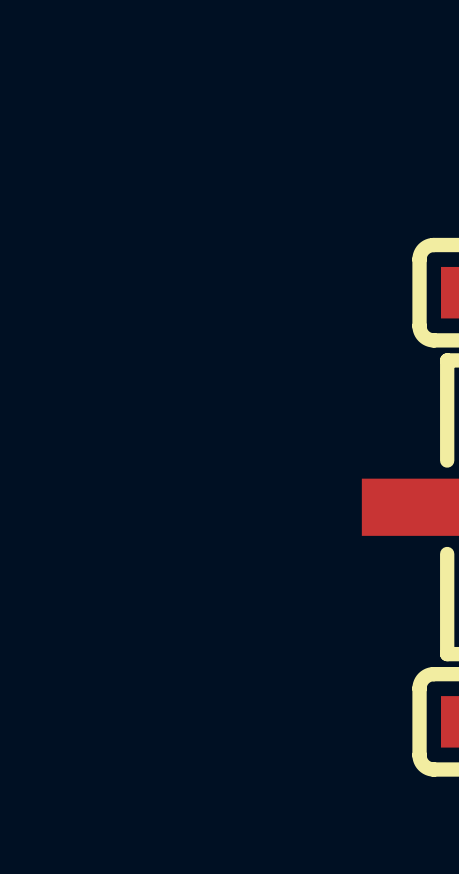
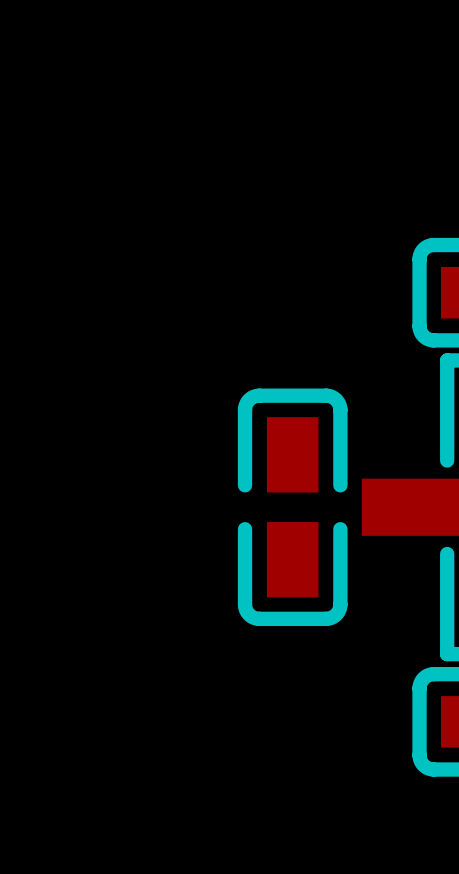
part: none -> (292, 507)

